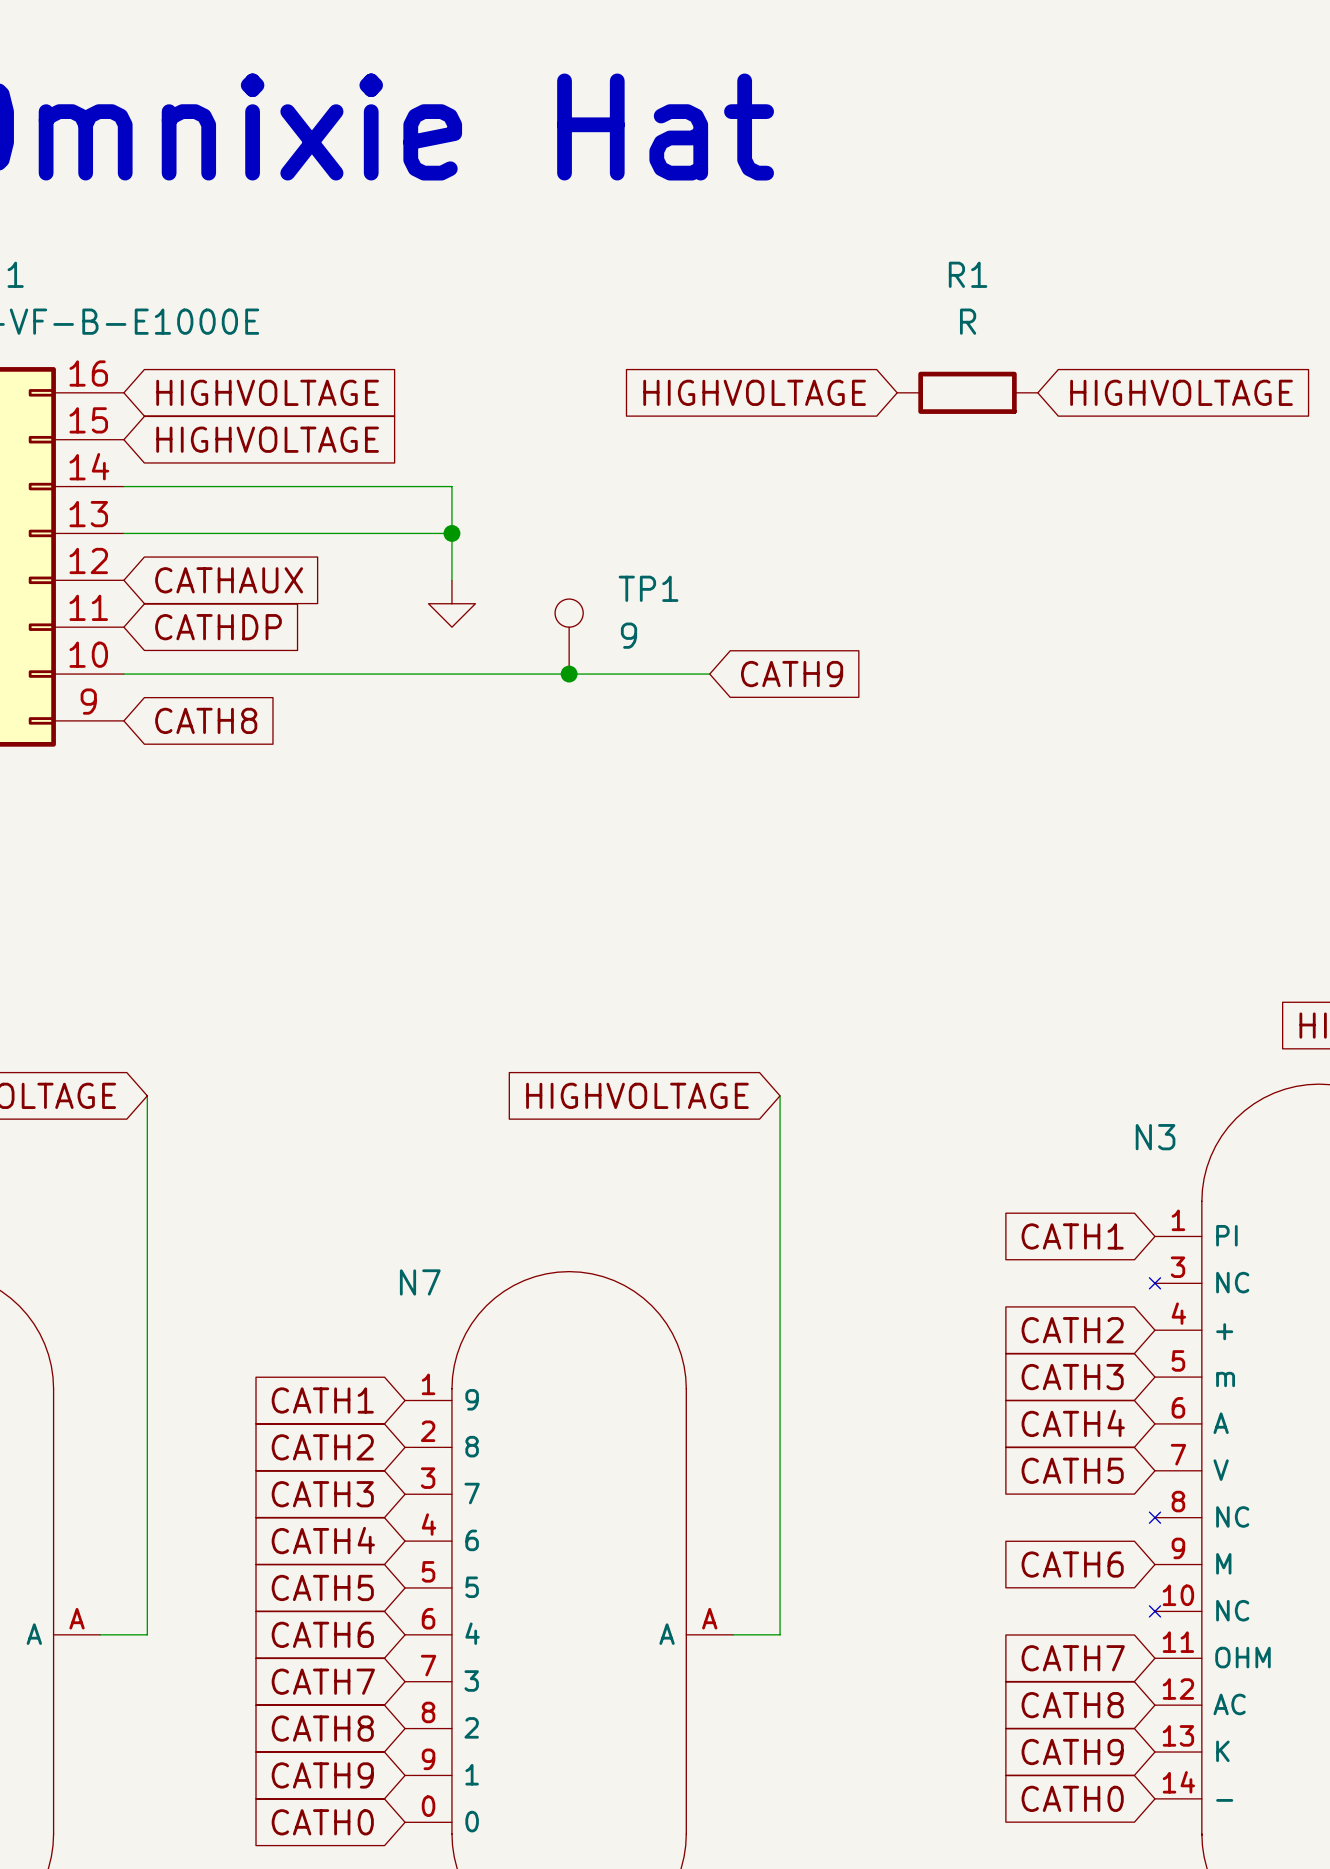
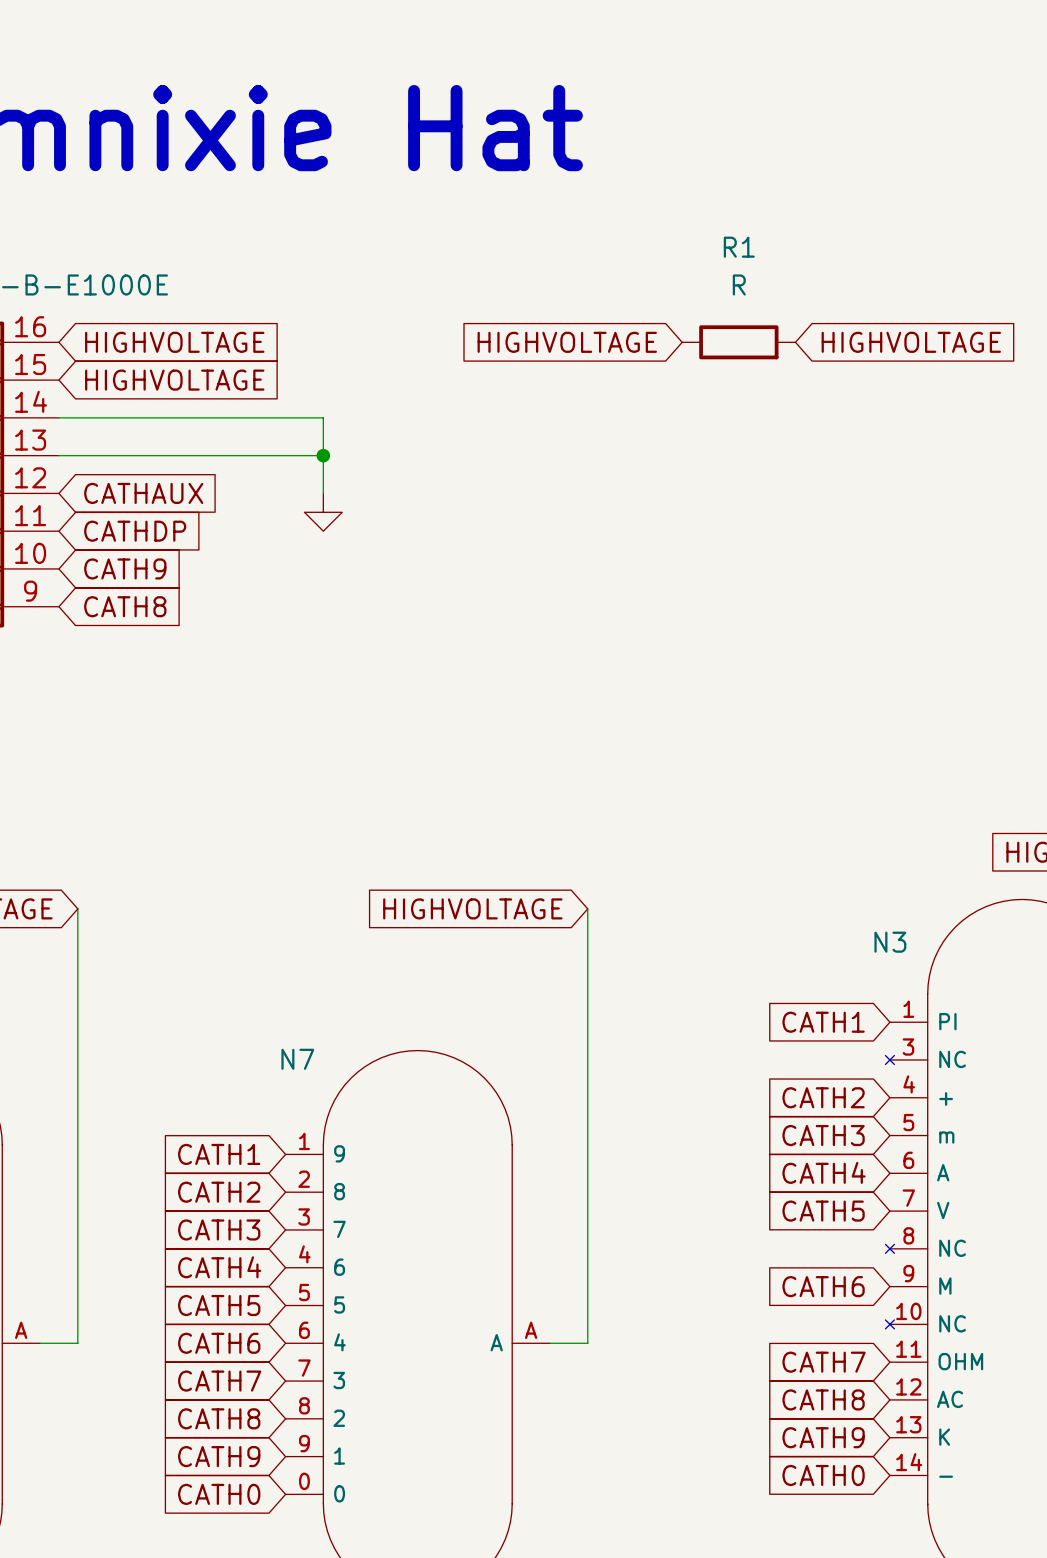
TP1: 9 (569, 636) -> none
wire: (123, 674) (709, 674) -> none
global label: none -> CATH9 (125, 568)
junction: (569, 674) -> none
global label: CATH9 (792, 674) -> none

